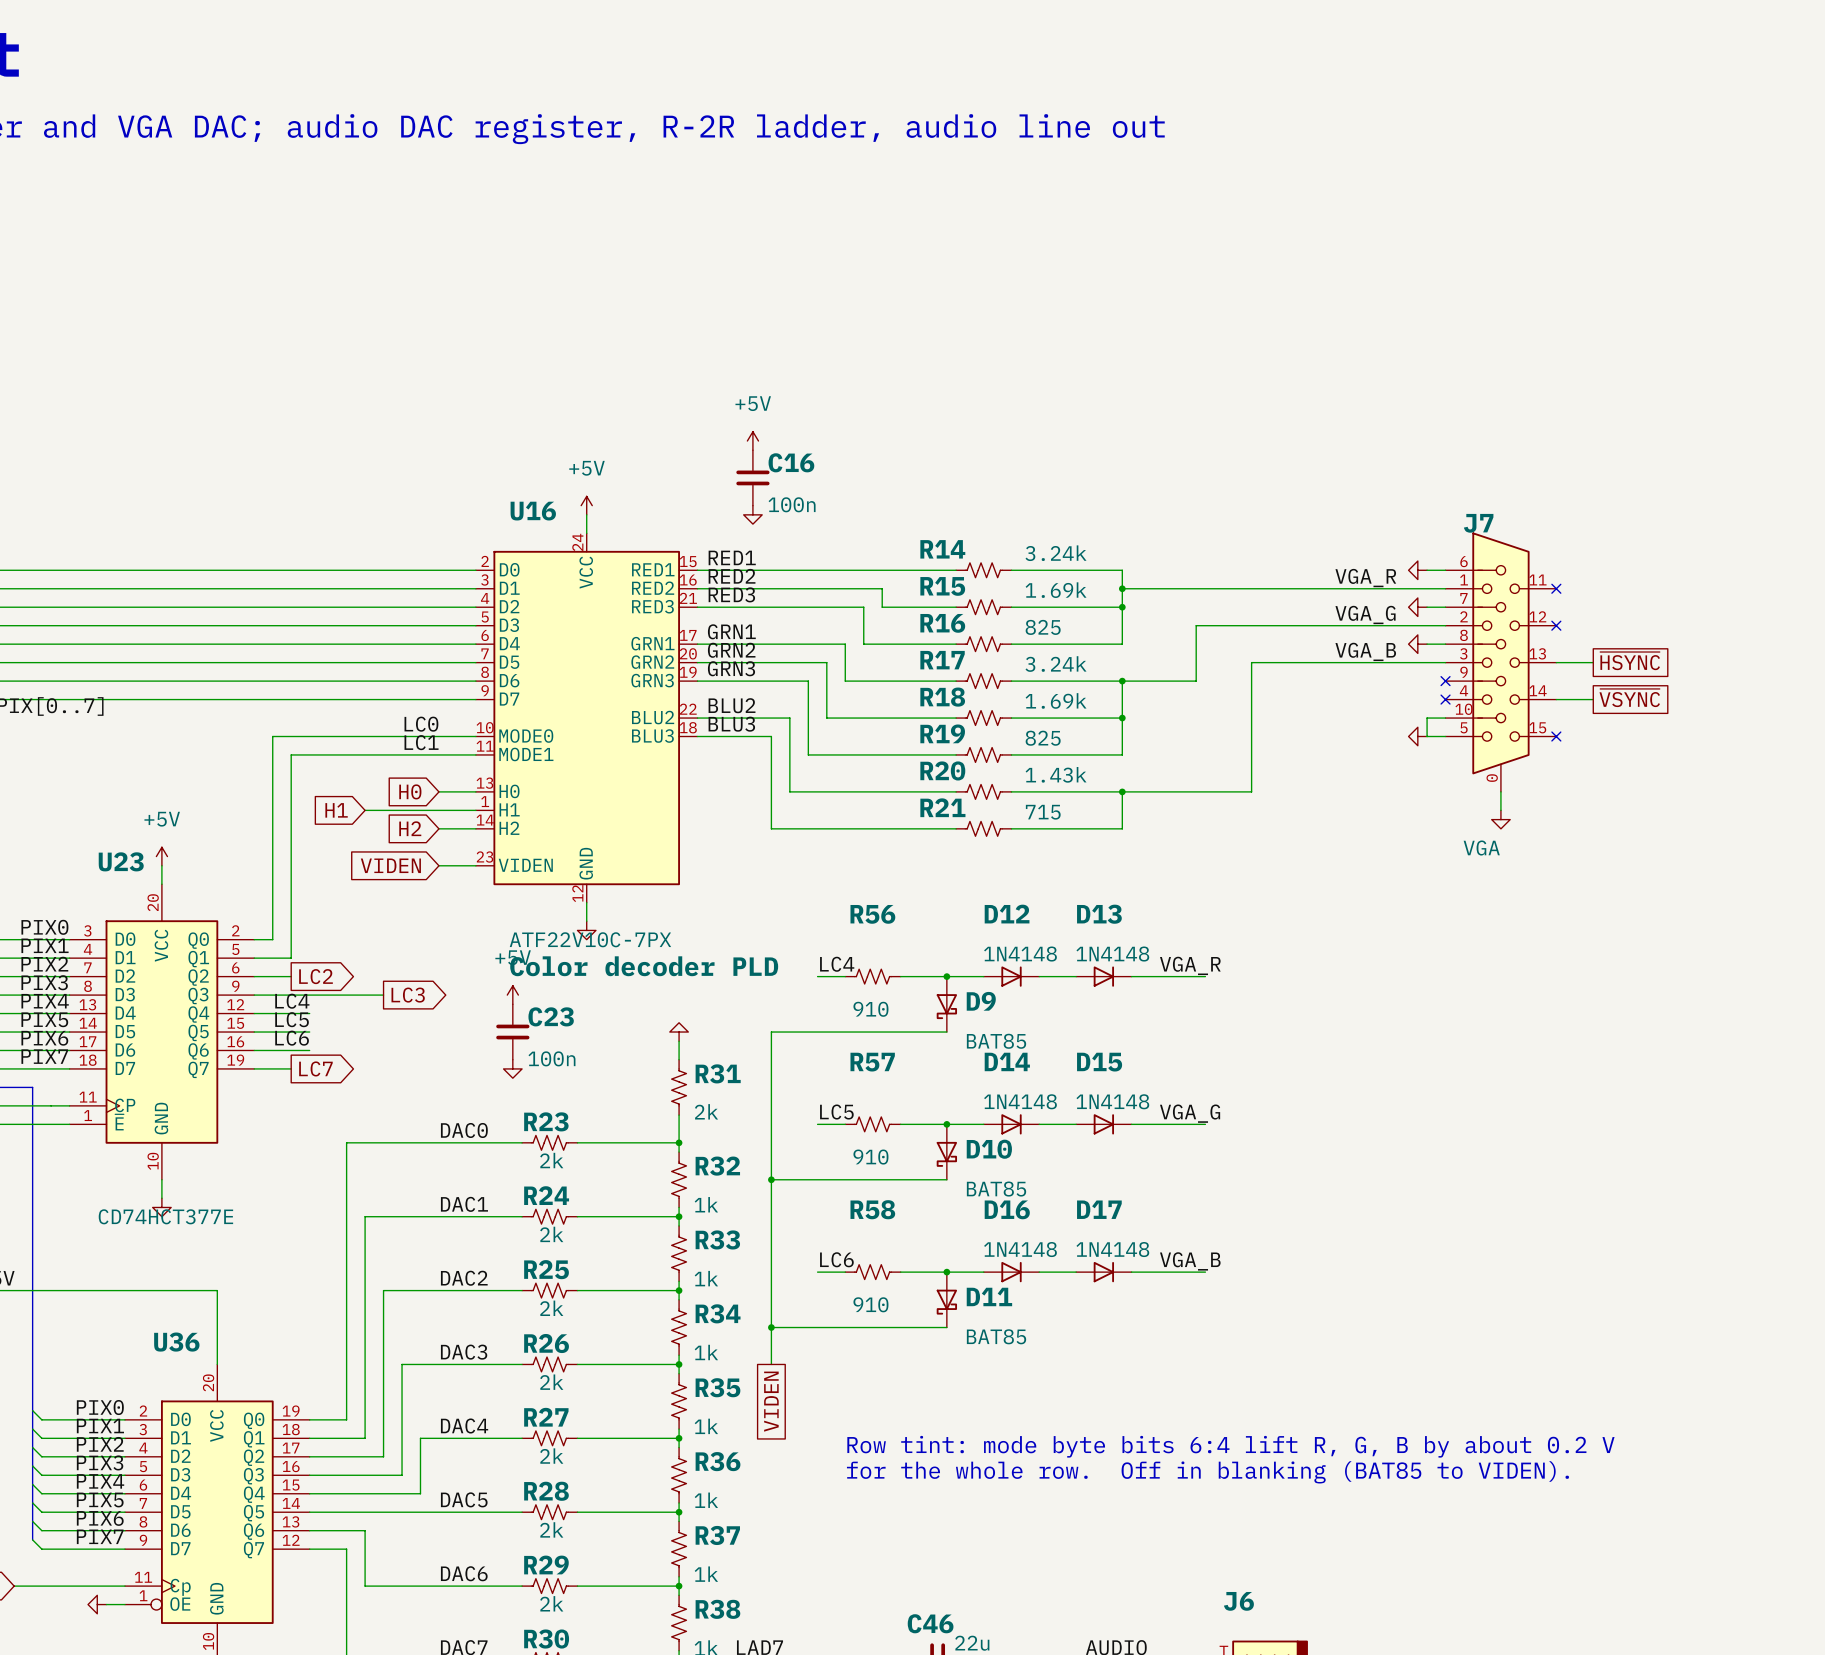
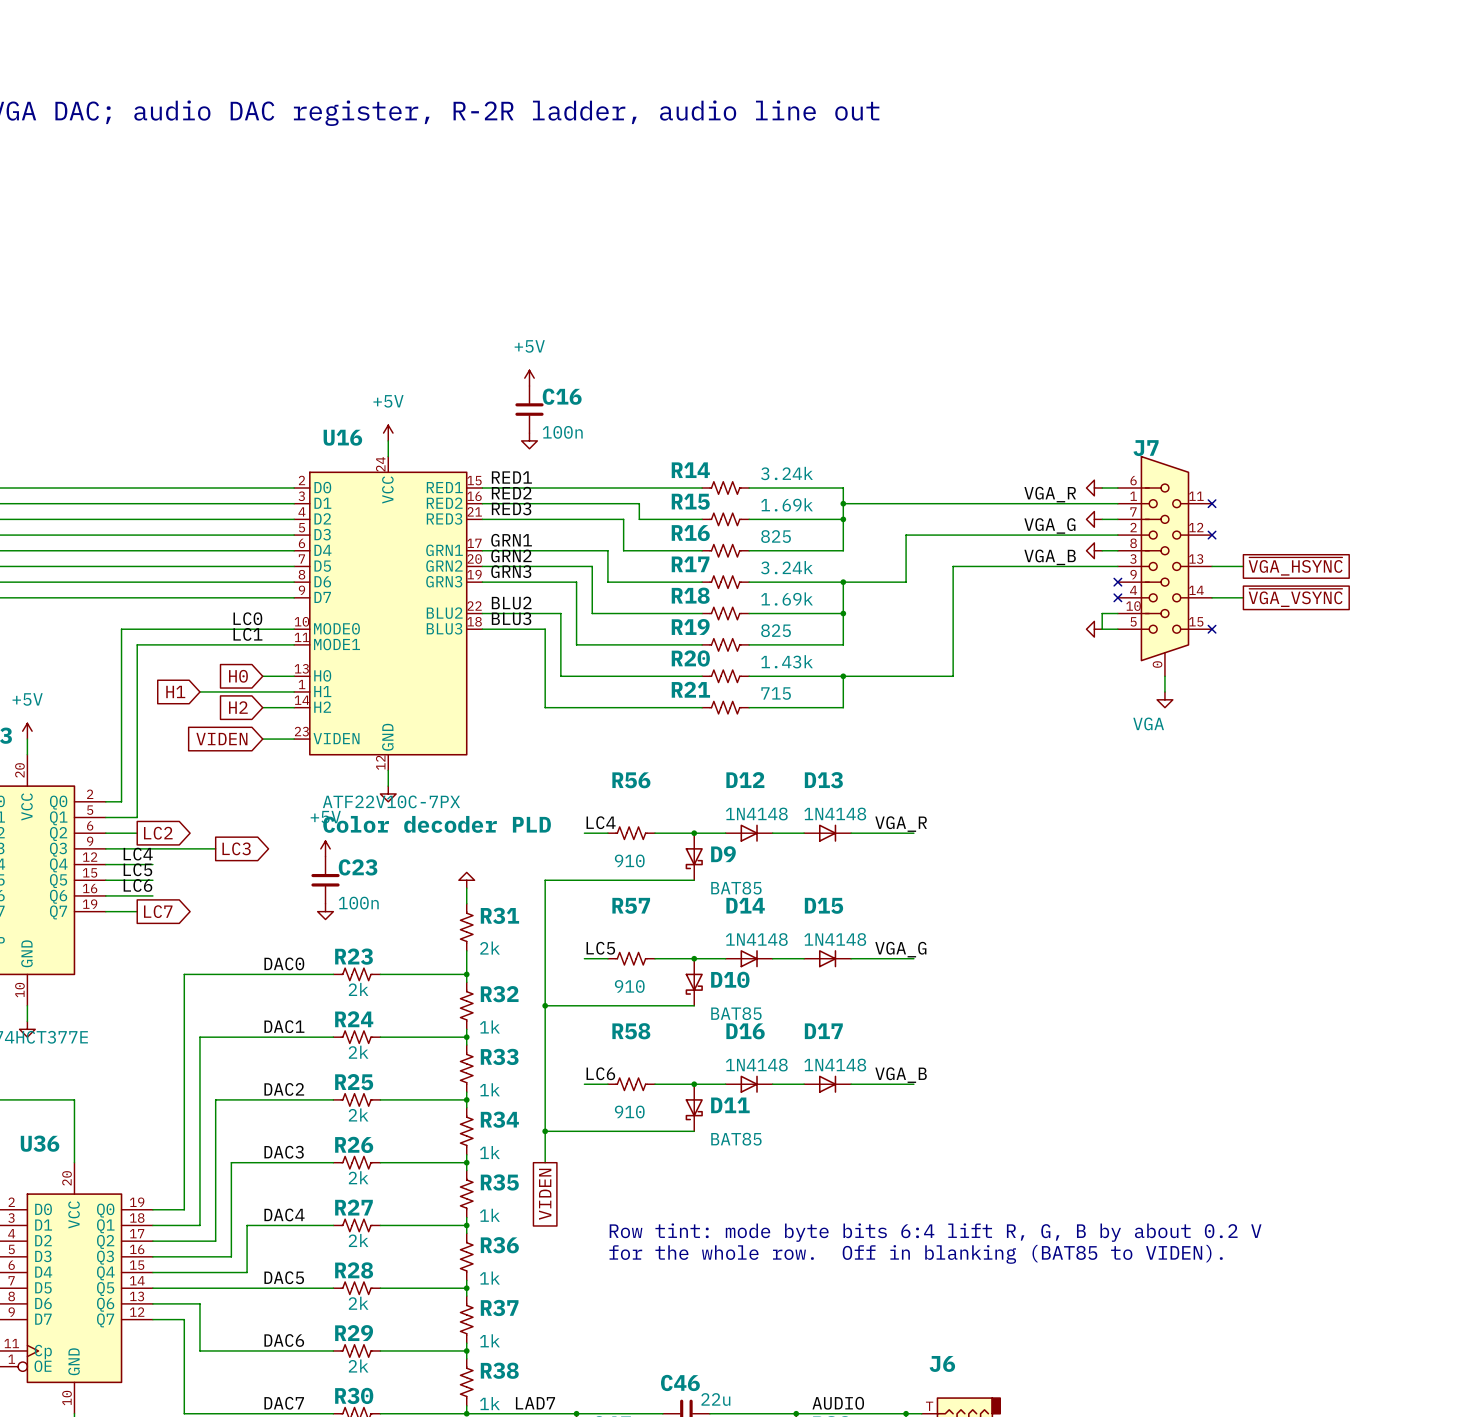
global label: ~{HSYNC} (1630, 661) -> ~{VGA_HSYNC} (1295, 566)
global label: ~{VSYNC} (1629, 698) -> ~{VGA_VSYNC} (1295, 597)

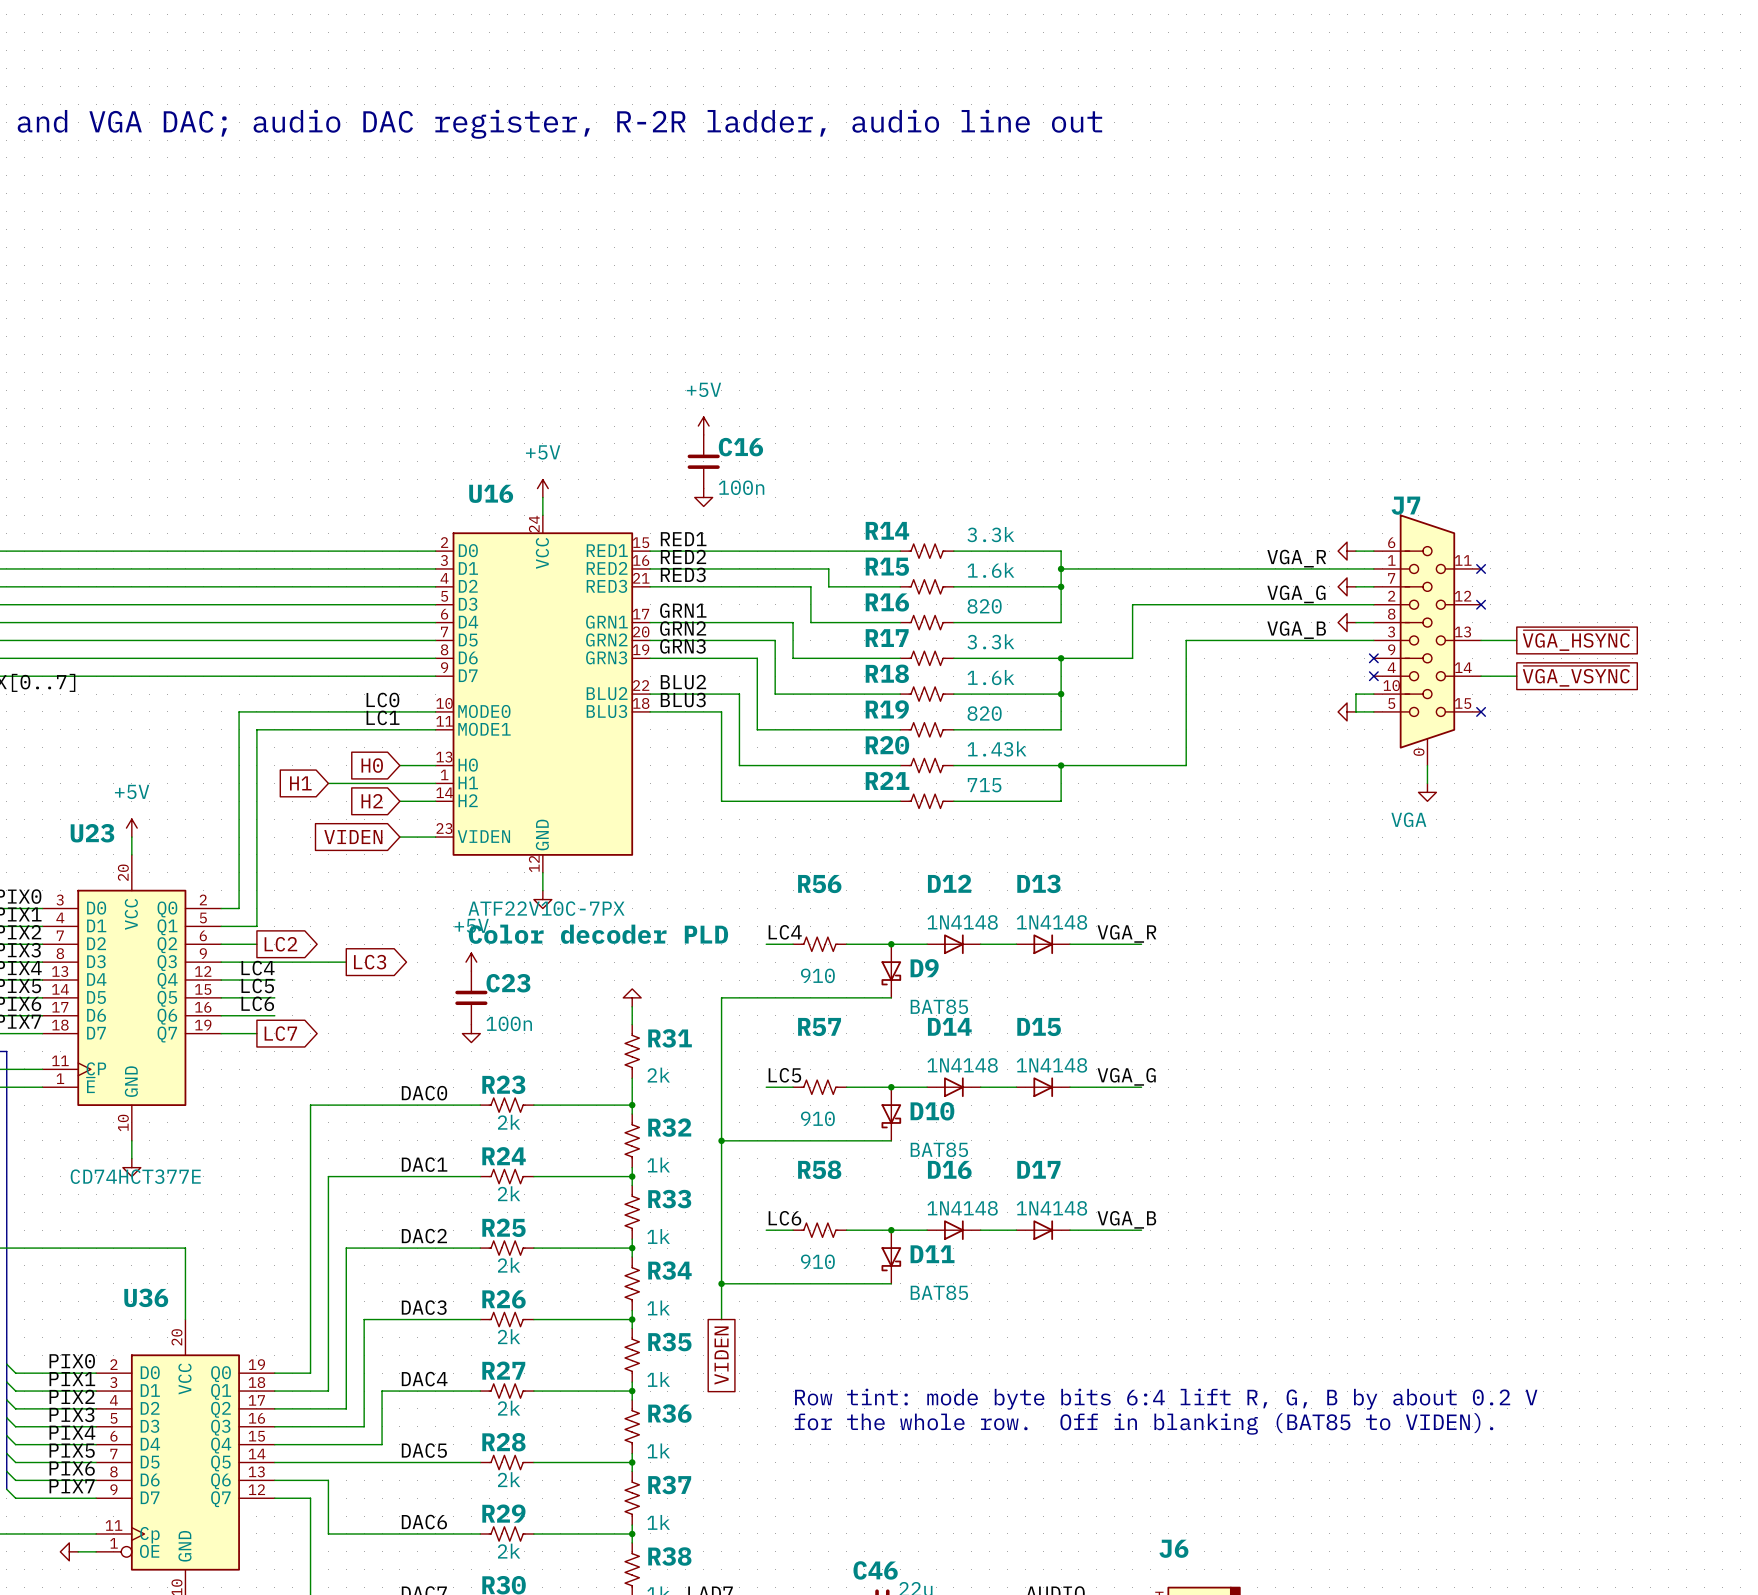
R14 value: 3.24k (786, 473) -> 3.3k (990, 534)
R15 value: 1.69k (787, 504) -> 1.6k (990, 570)
R16 value: 825 (776, 536) -> 820 (984, 606)
R17 value: 3.24k (786, 567) -> 3.3k (990, 641)
R18 value: 1.69k (787, 599) -> 1.6k (990, 677)
R19 value: 825 (776, 630) -> 820 (984, 713)

